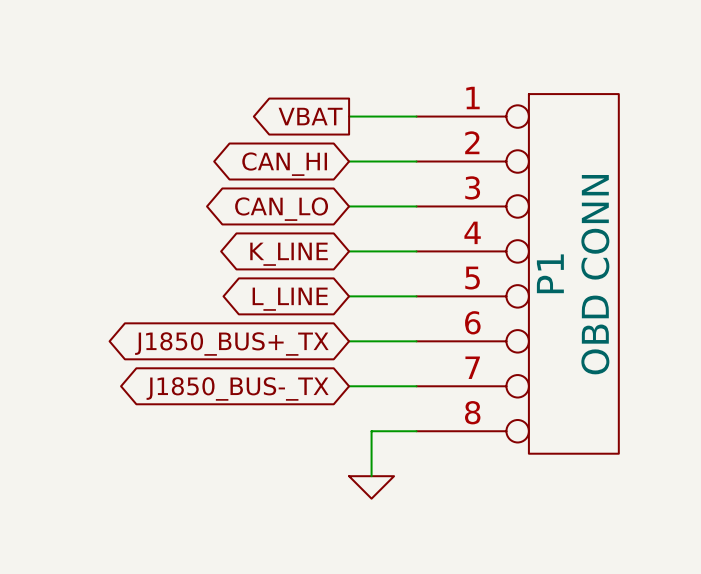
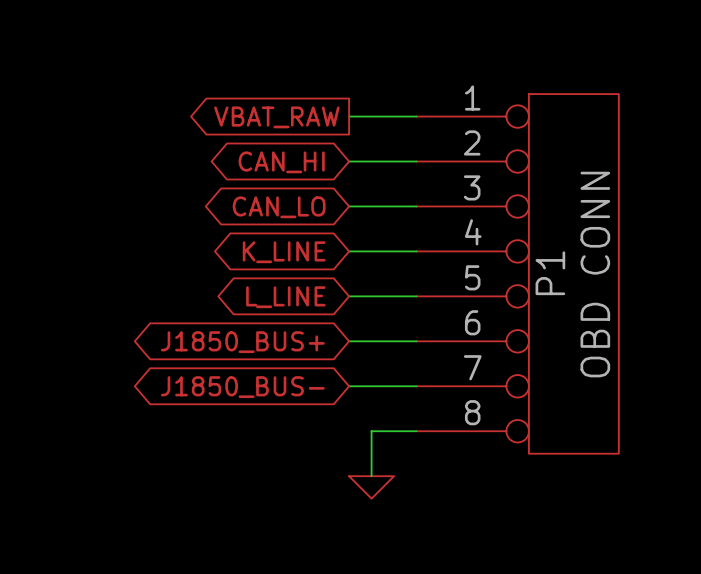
global label: VBAT (310, 116) -> VBAT_RAW (276, 117)
global label: J1850_BUS+_TX (231, 344) -> J1850_BUS+ (242, 342)
global label: J1850_BUS-_TX (237, 388) -> J1850_BUS- (242, 387)

